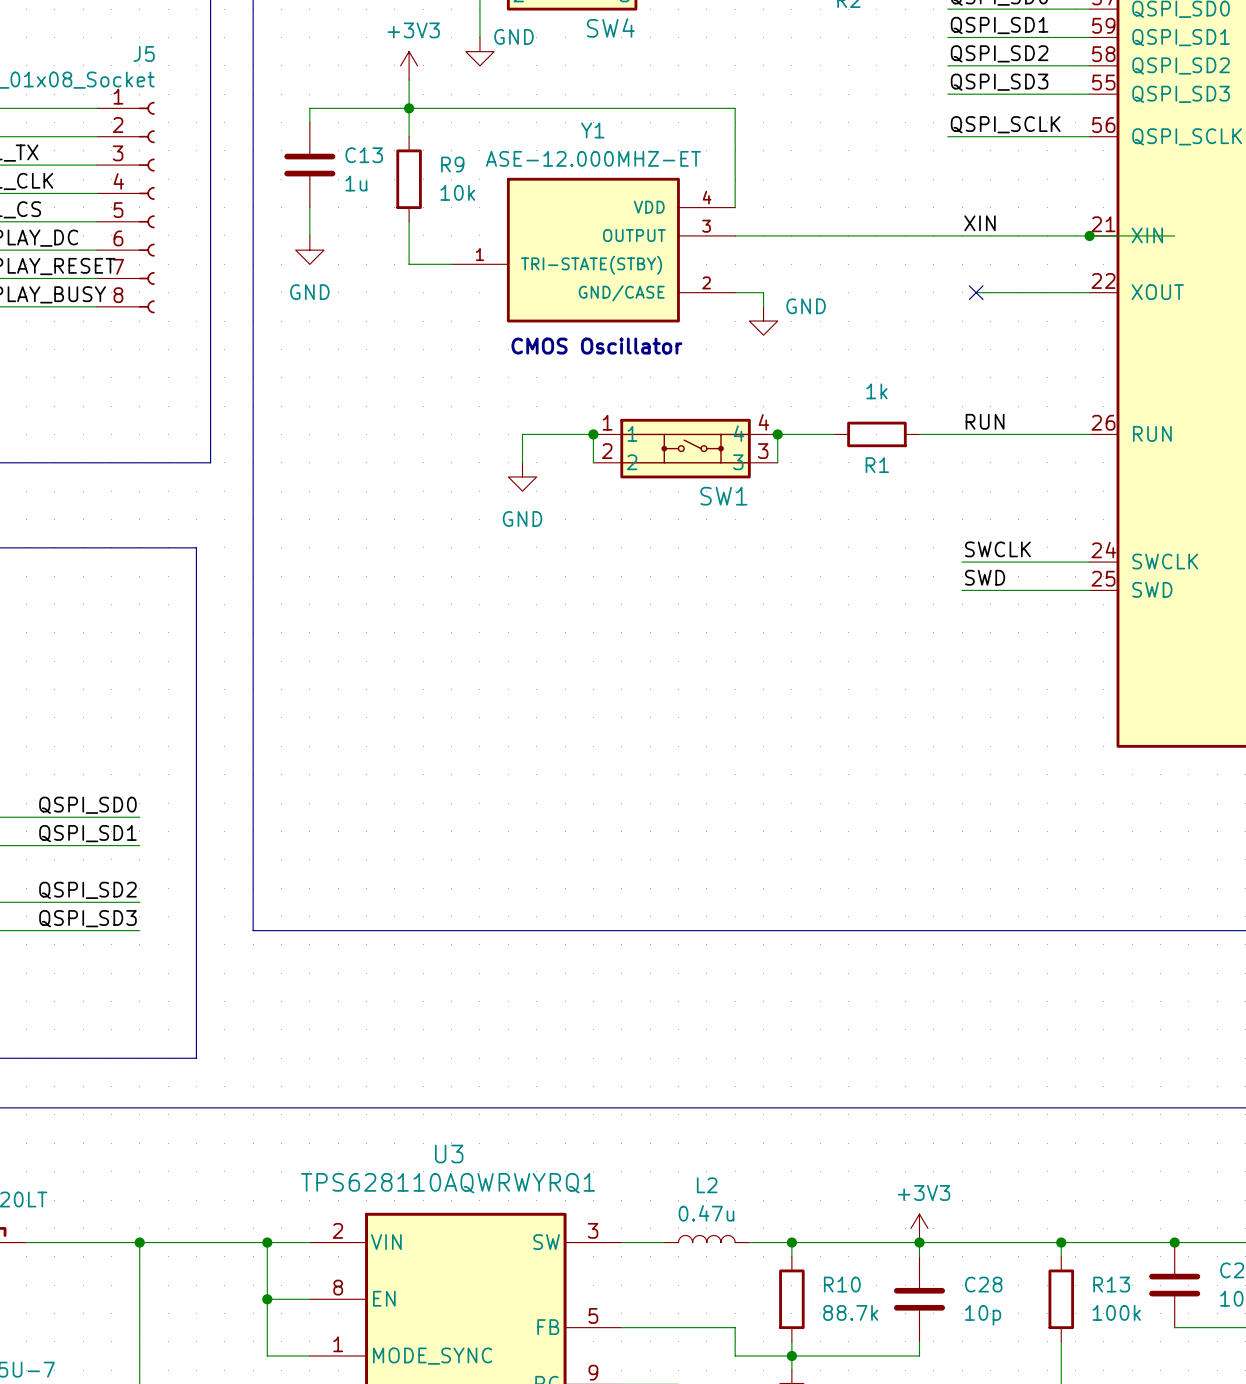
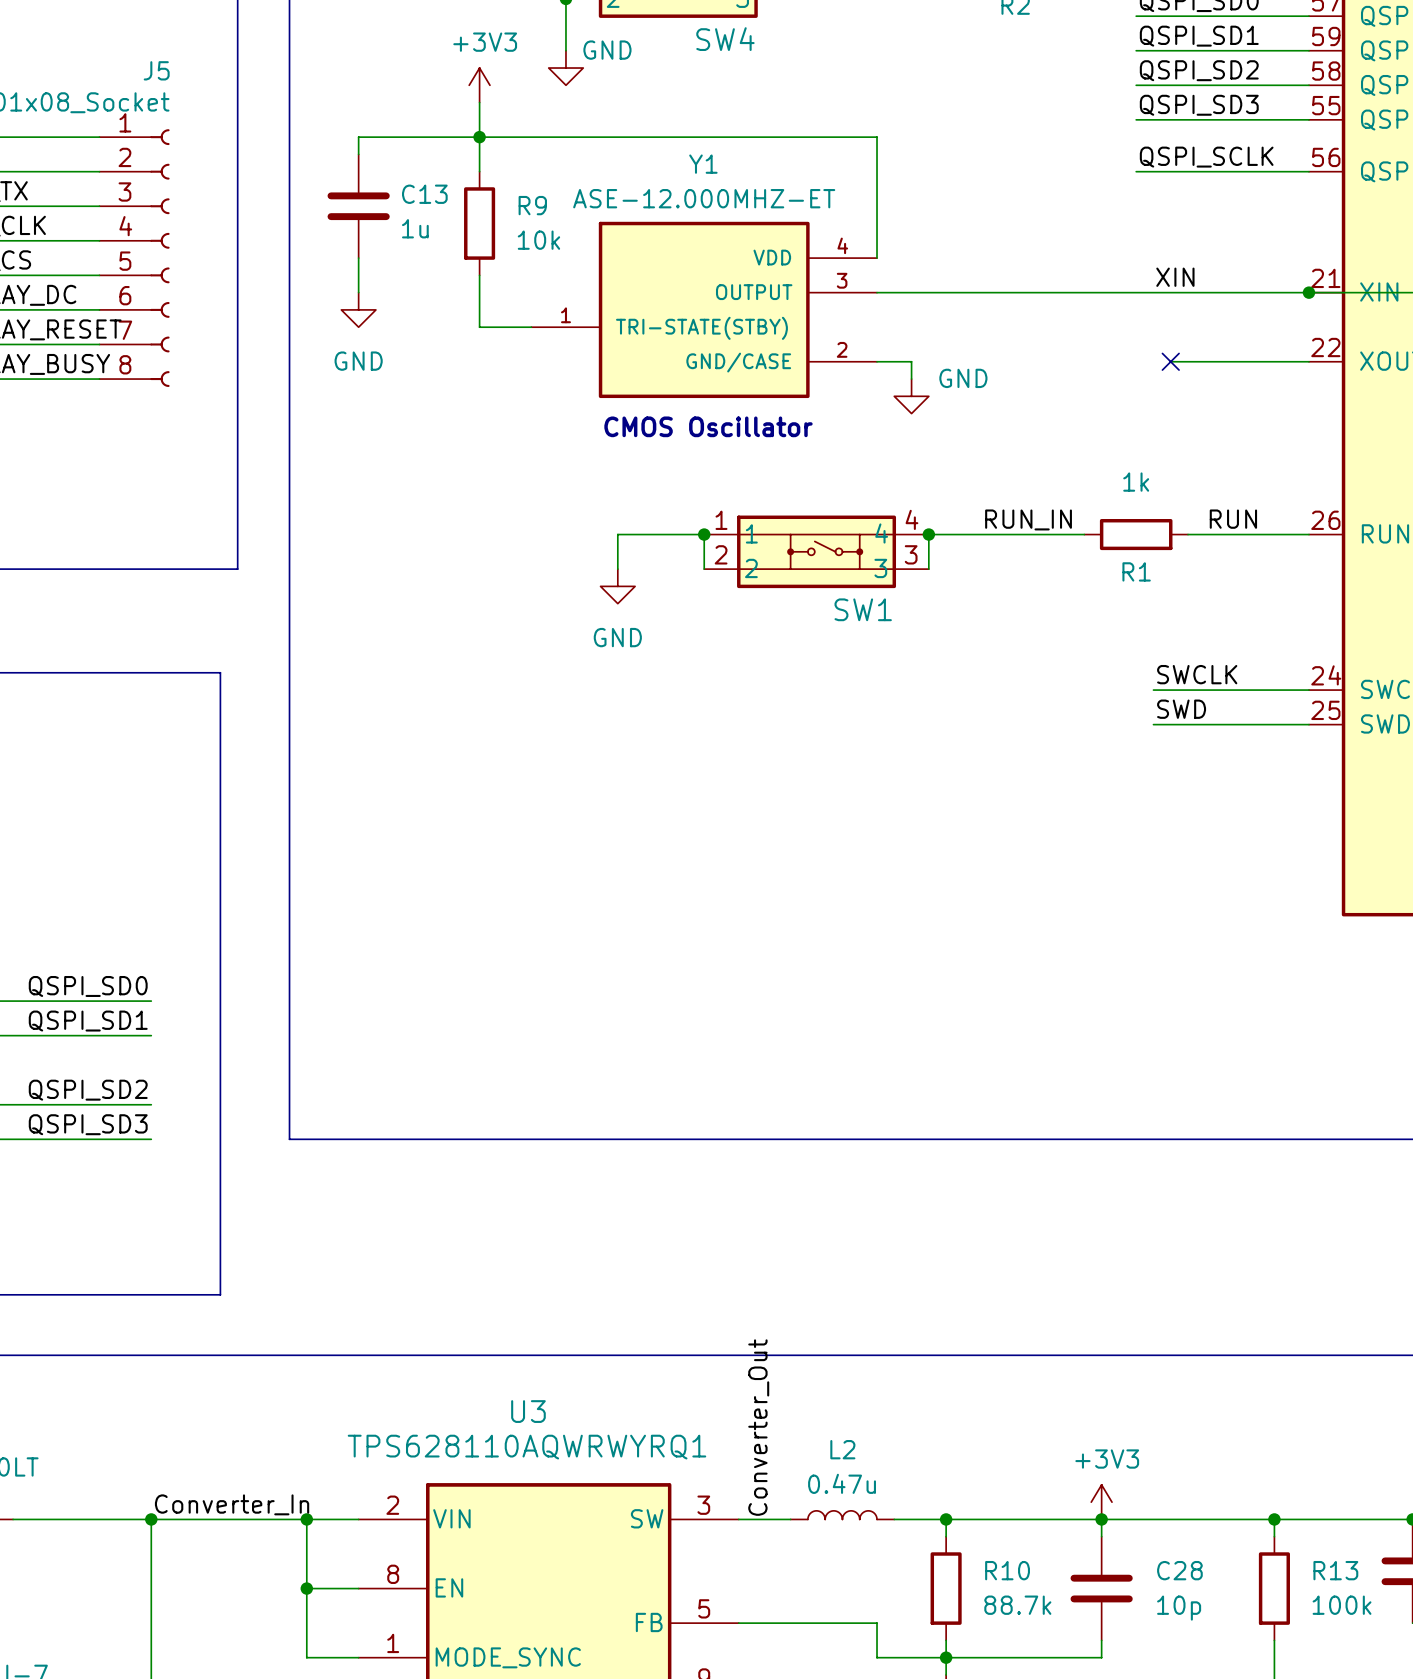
label position: RUN (985, 421) -> RUN (1233, 519)
label: none -> RUN_IN (1028, 519)
R1 position: (876, 434) -> (1136, 534)
wire: (919, 434) (990, 434) -> (997, 534) (1084, 534)
label: none -> Converter_Out (758, 1427)
label: none -> Converter_In (232, 1504)

